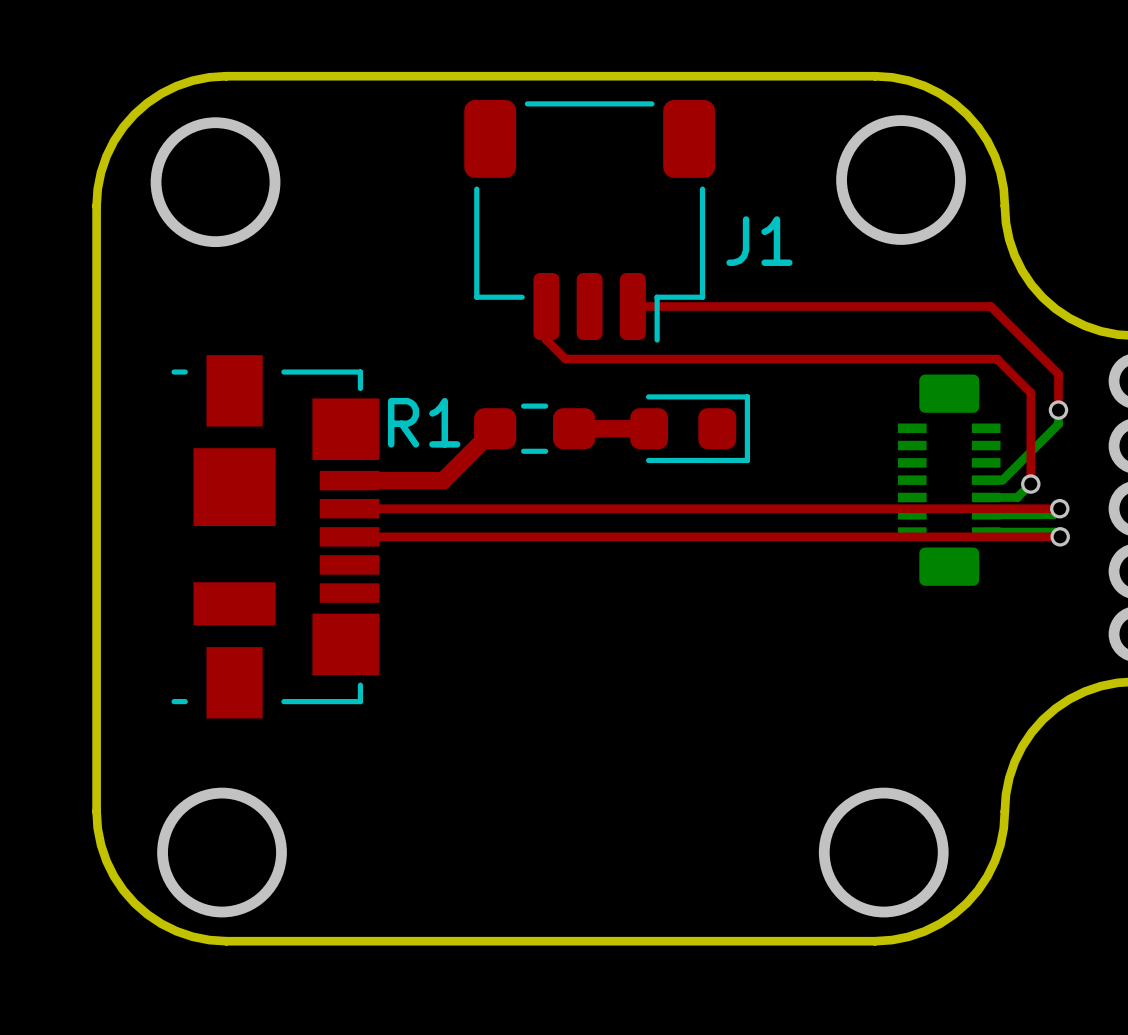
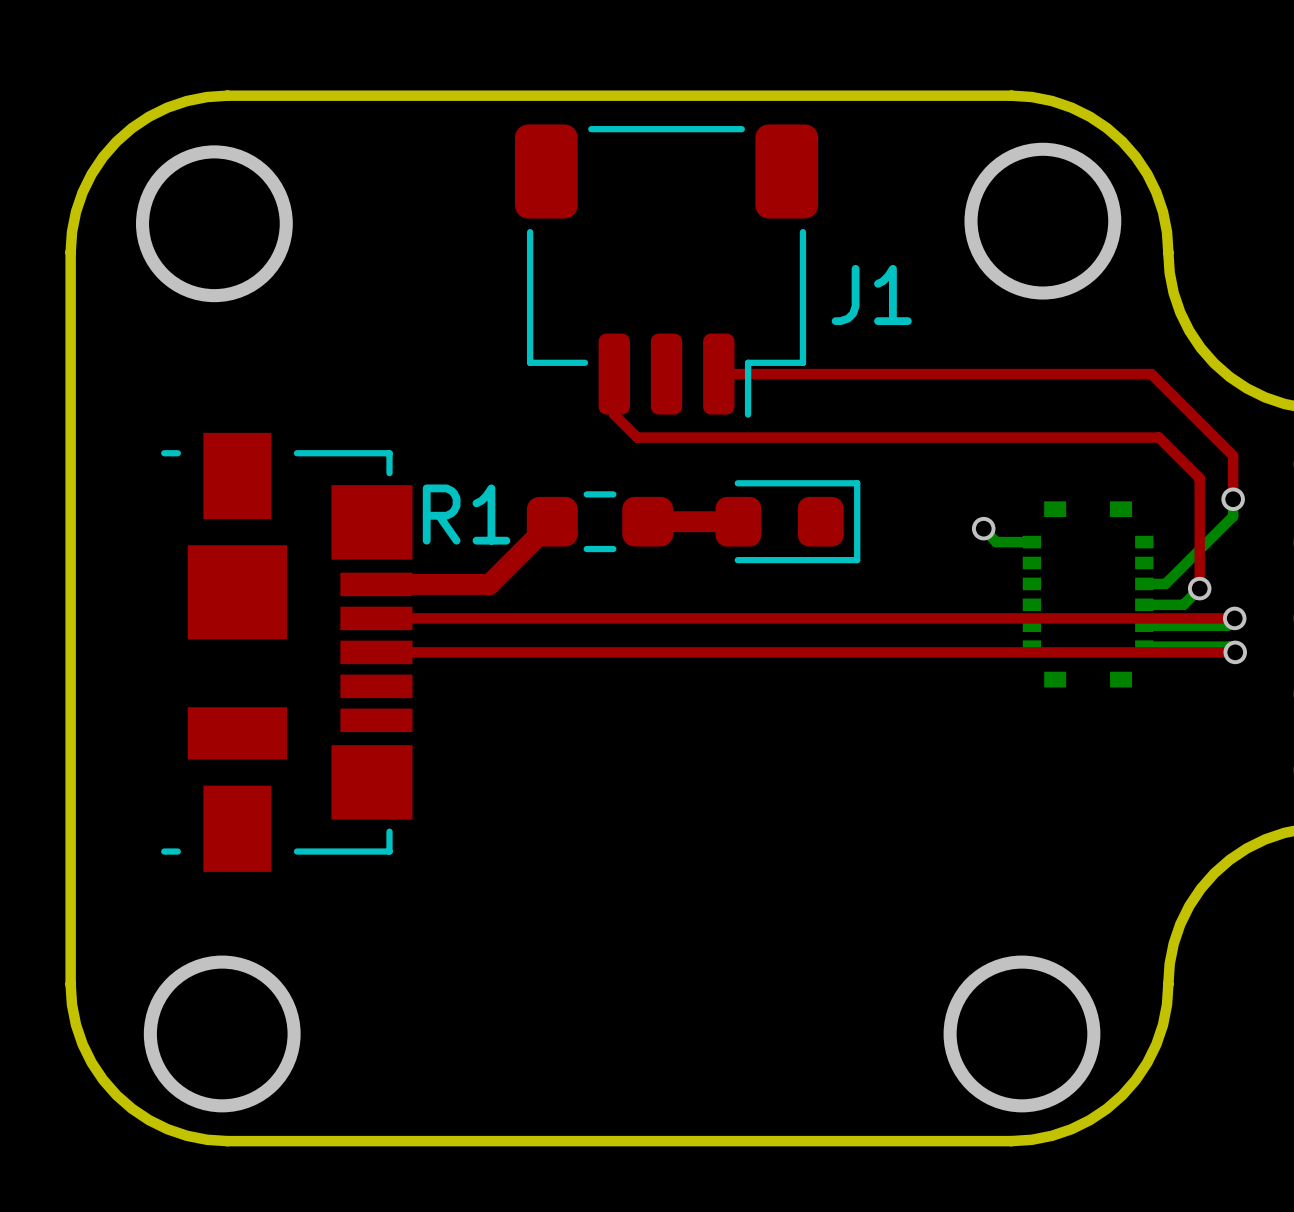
part footprint: [898, 374, 1001, 586] -> [1022, 501, 1154, 688]
via: none -> (983, 528)
bottom track: none -> (984, 530) (996, 542) (1031, 542)

